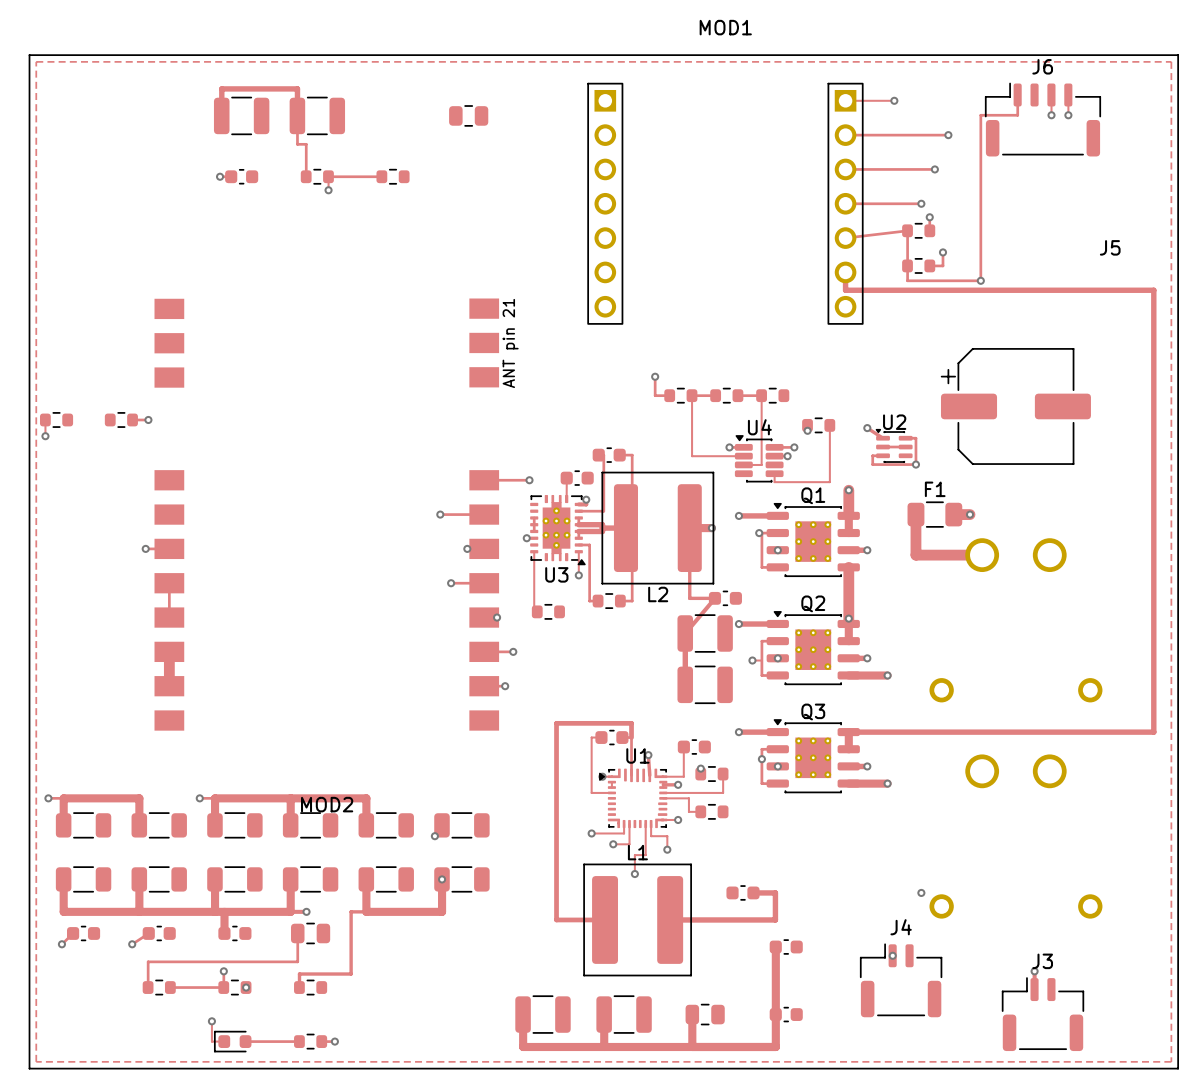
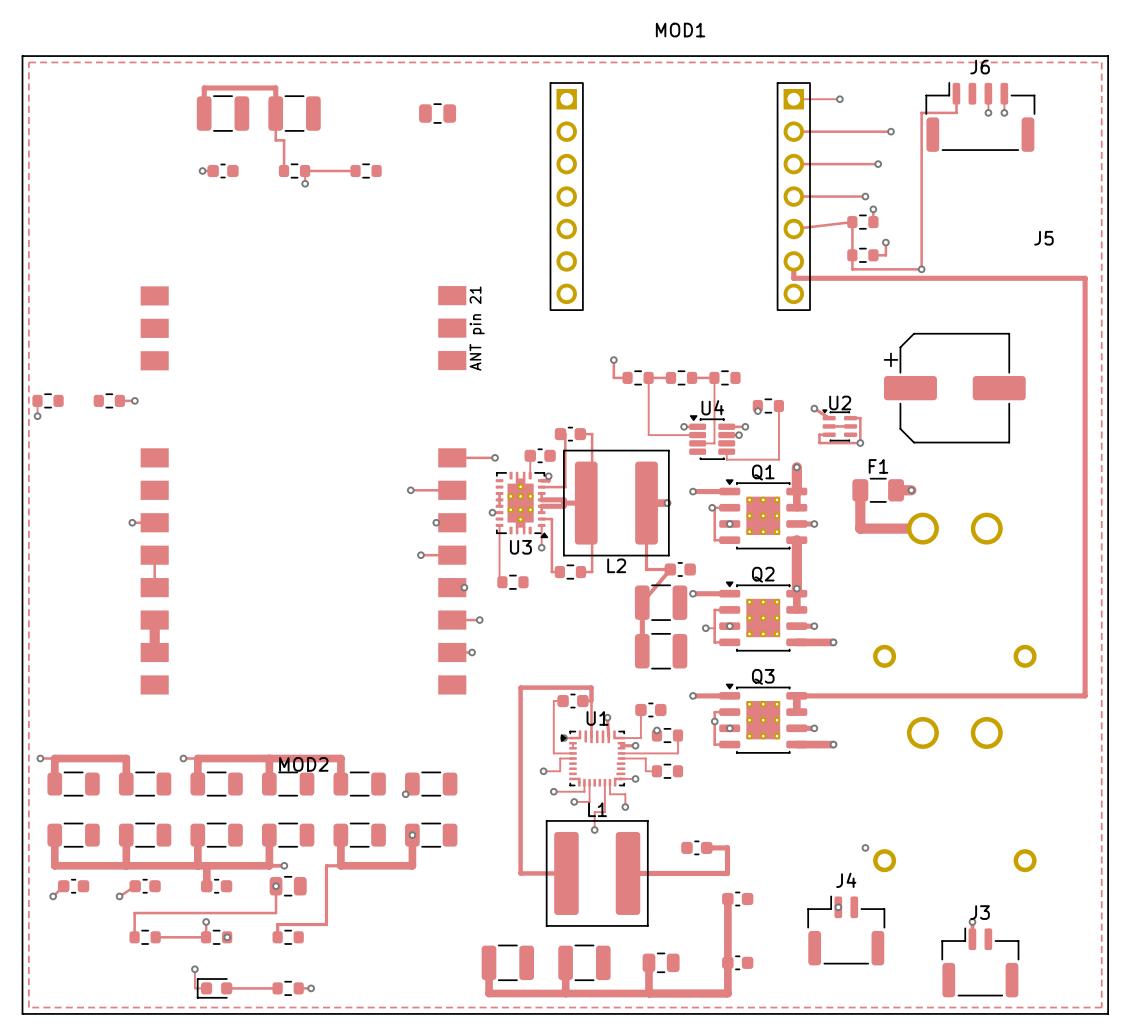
track: none -> (572, 758) (560, 758) (560, 771) (543, 771)
via: none -> (543, 771)
via: none -> (276, 886)

